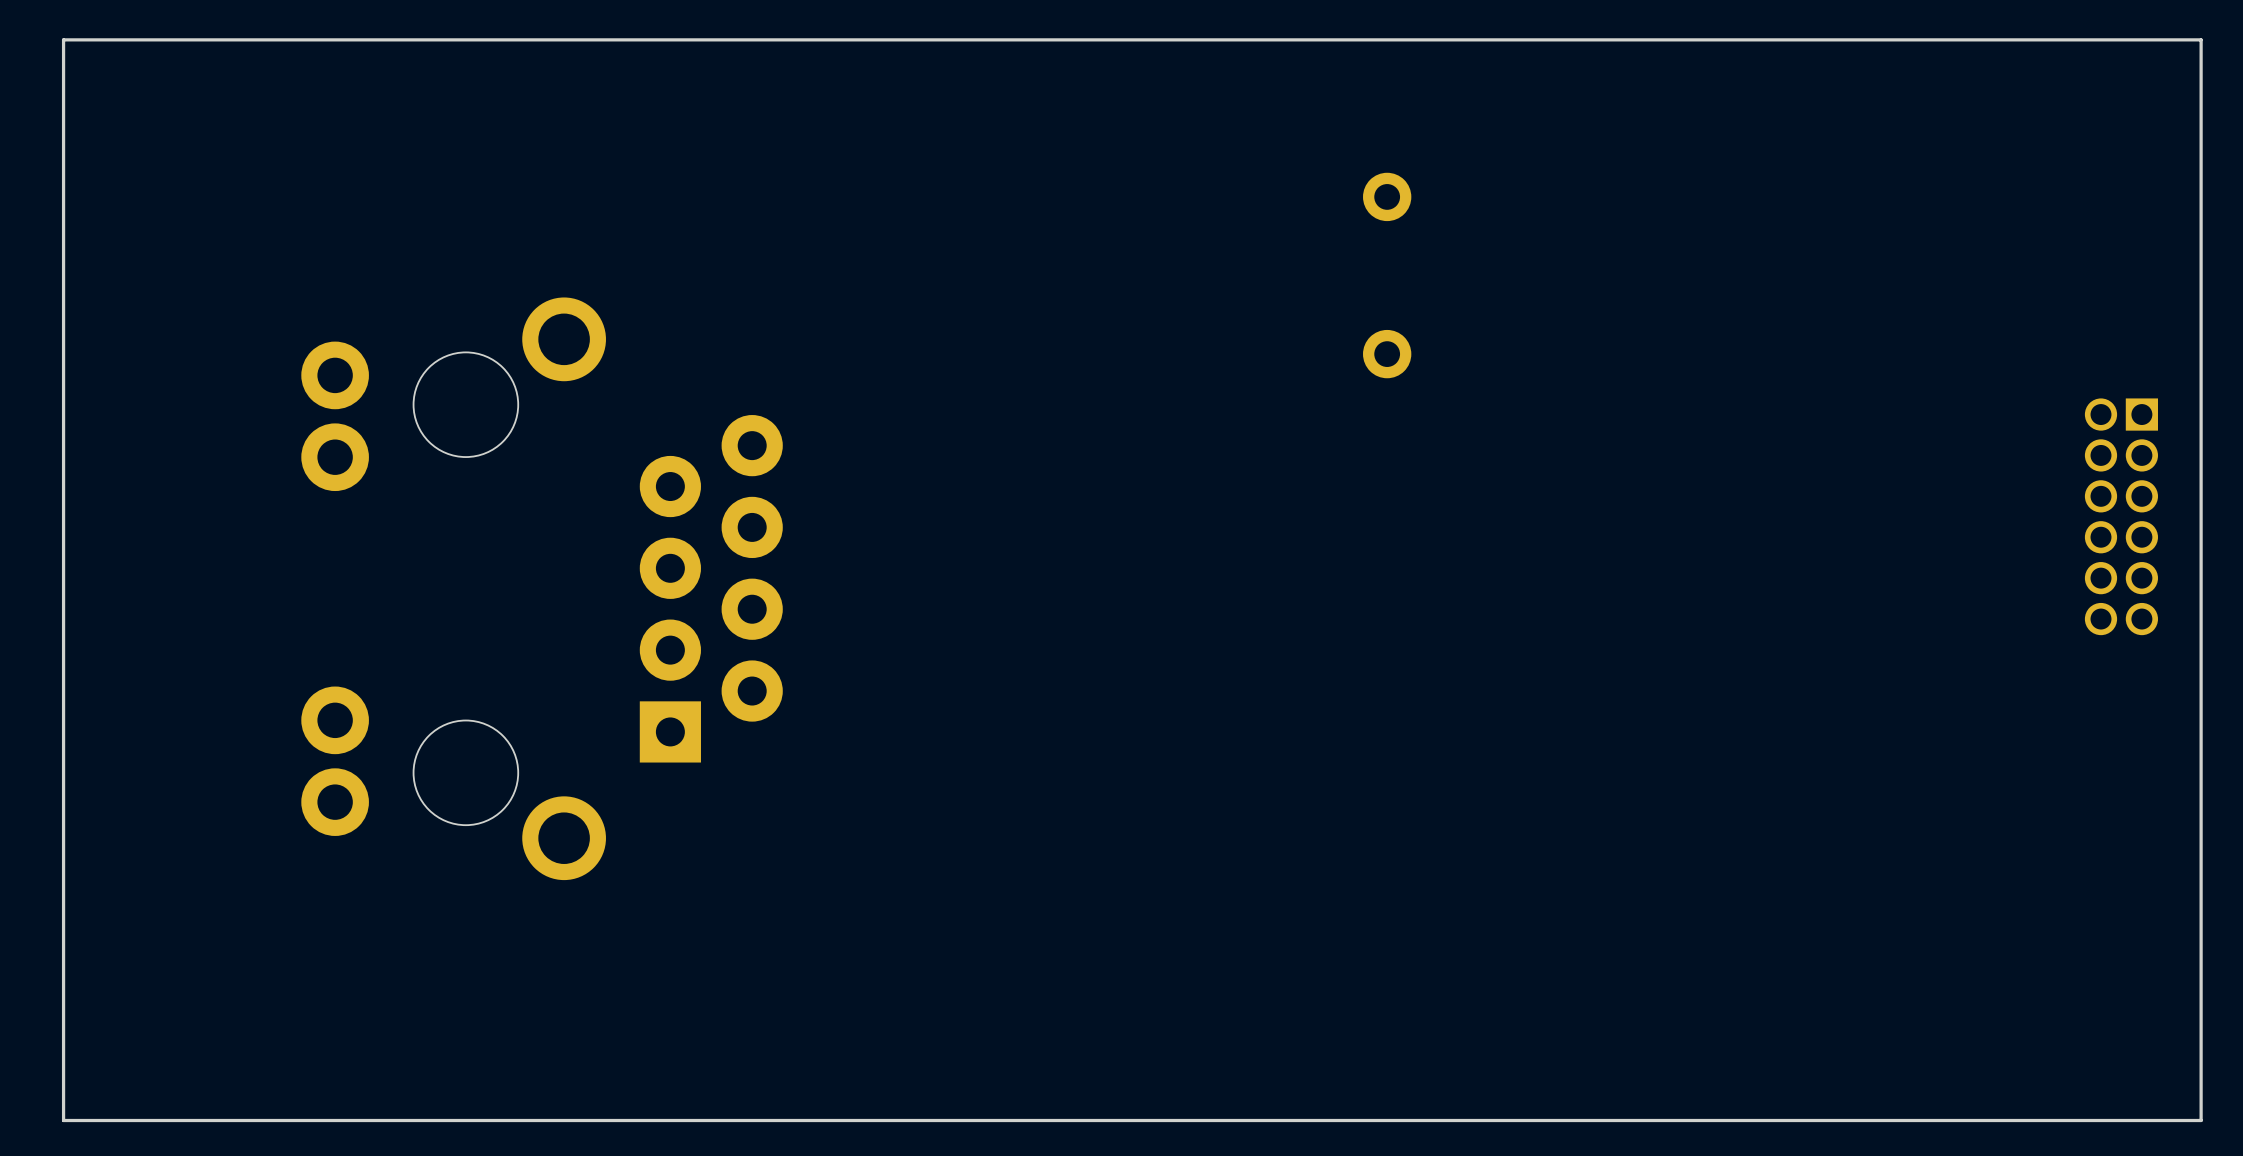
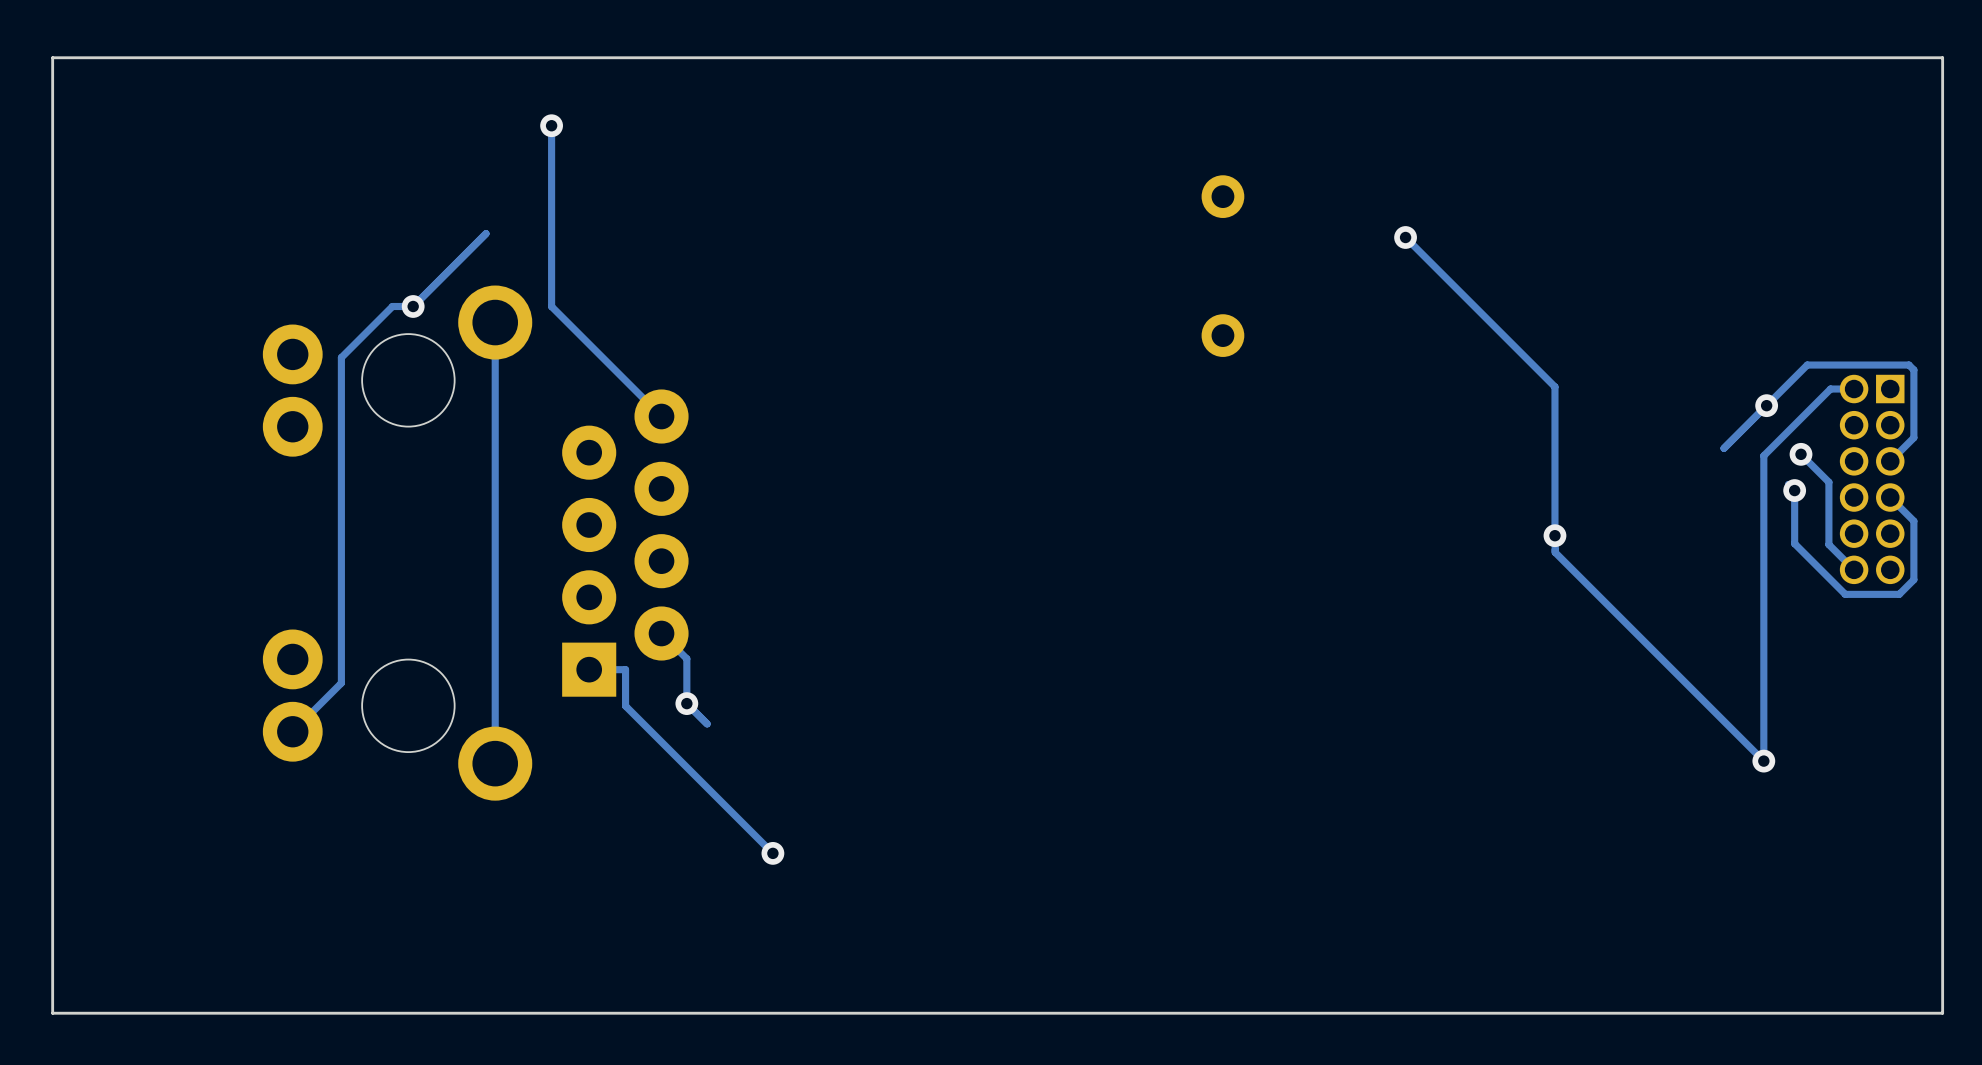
track: none -> (551, 125) (551, 306) (661, 416)
via: none -> (551, 125)
track: none -> (486, 233) (413, 306) (392, 306) (341, 357) (341, 683) (292, 731)
track: none -> (1405, 237) (1554, 386) (1554, 535)
via: none -> (1405, 237)
via: none -> (413, 306)
track: none -> (495, 322) (495, 763)
track: none -> (1854, 389) (1830, 389) (1763, 455) (1763, 761) (1555, 552) (1555, 535)
via: none -> (1766, 405)
track: none -> (1723, 448) (1807, 365) (1908, 365) (1913, 369) (1913, 437) (1890, 461)
track: none -> (1798, 452) (1828, 482) (1828, 544) (1854, 569)
via: none -> (1801, 454)
track: none -> (1788, 484) (1794, 490) (1794, 543) (1845, 594) (1899, 594) (1913, 579) (1913, 521) (1890, 497)
via: none -> (1794, 490)
via: none -> (1554, 535)
track: none -> (661, 633) (686, 658) (686, 703) (707, 723)
track: none -> (589, 669) (625, 669) (625, 706) (772, 853)
via: none -> (686, 703)
via: none -> (1763, 761)
via: none -> (772, 853)

